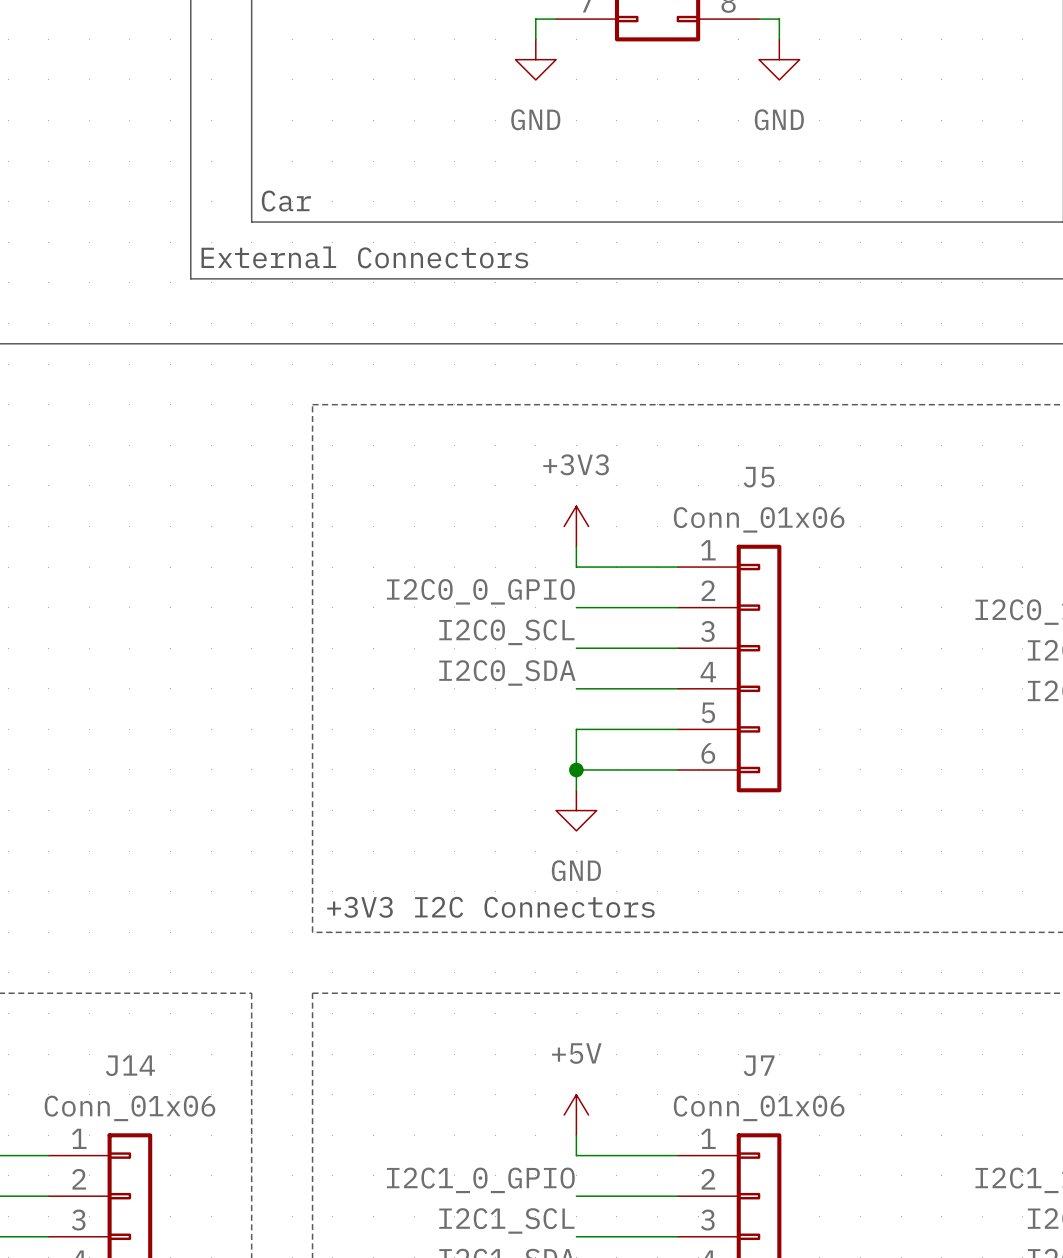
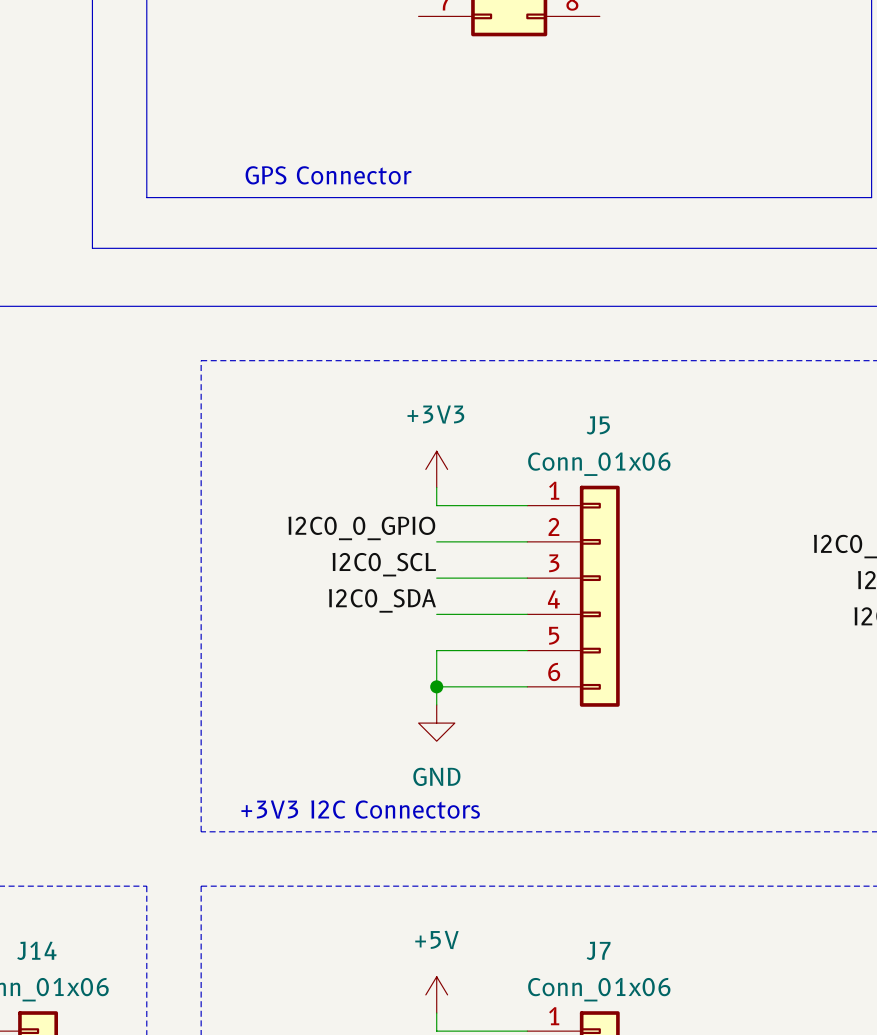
wire: (556, 19) (535, 19) (535, 39) -> none
wire: (759, 19) (779, 19) (779, 39) -> none
power symbol: GND (535, 59) -> none
power symbol: GND (779, 59) -> none
text: none -> GPS Connector (328, 175)
text: Car (286, 201) -> none
text: External Connectors (364, 257) -> none

